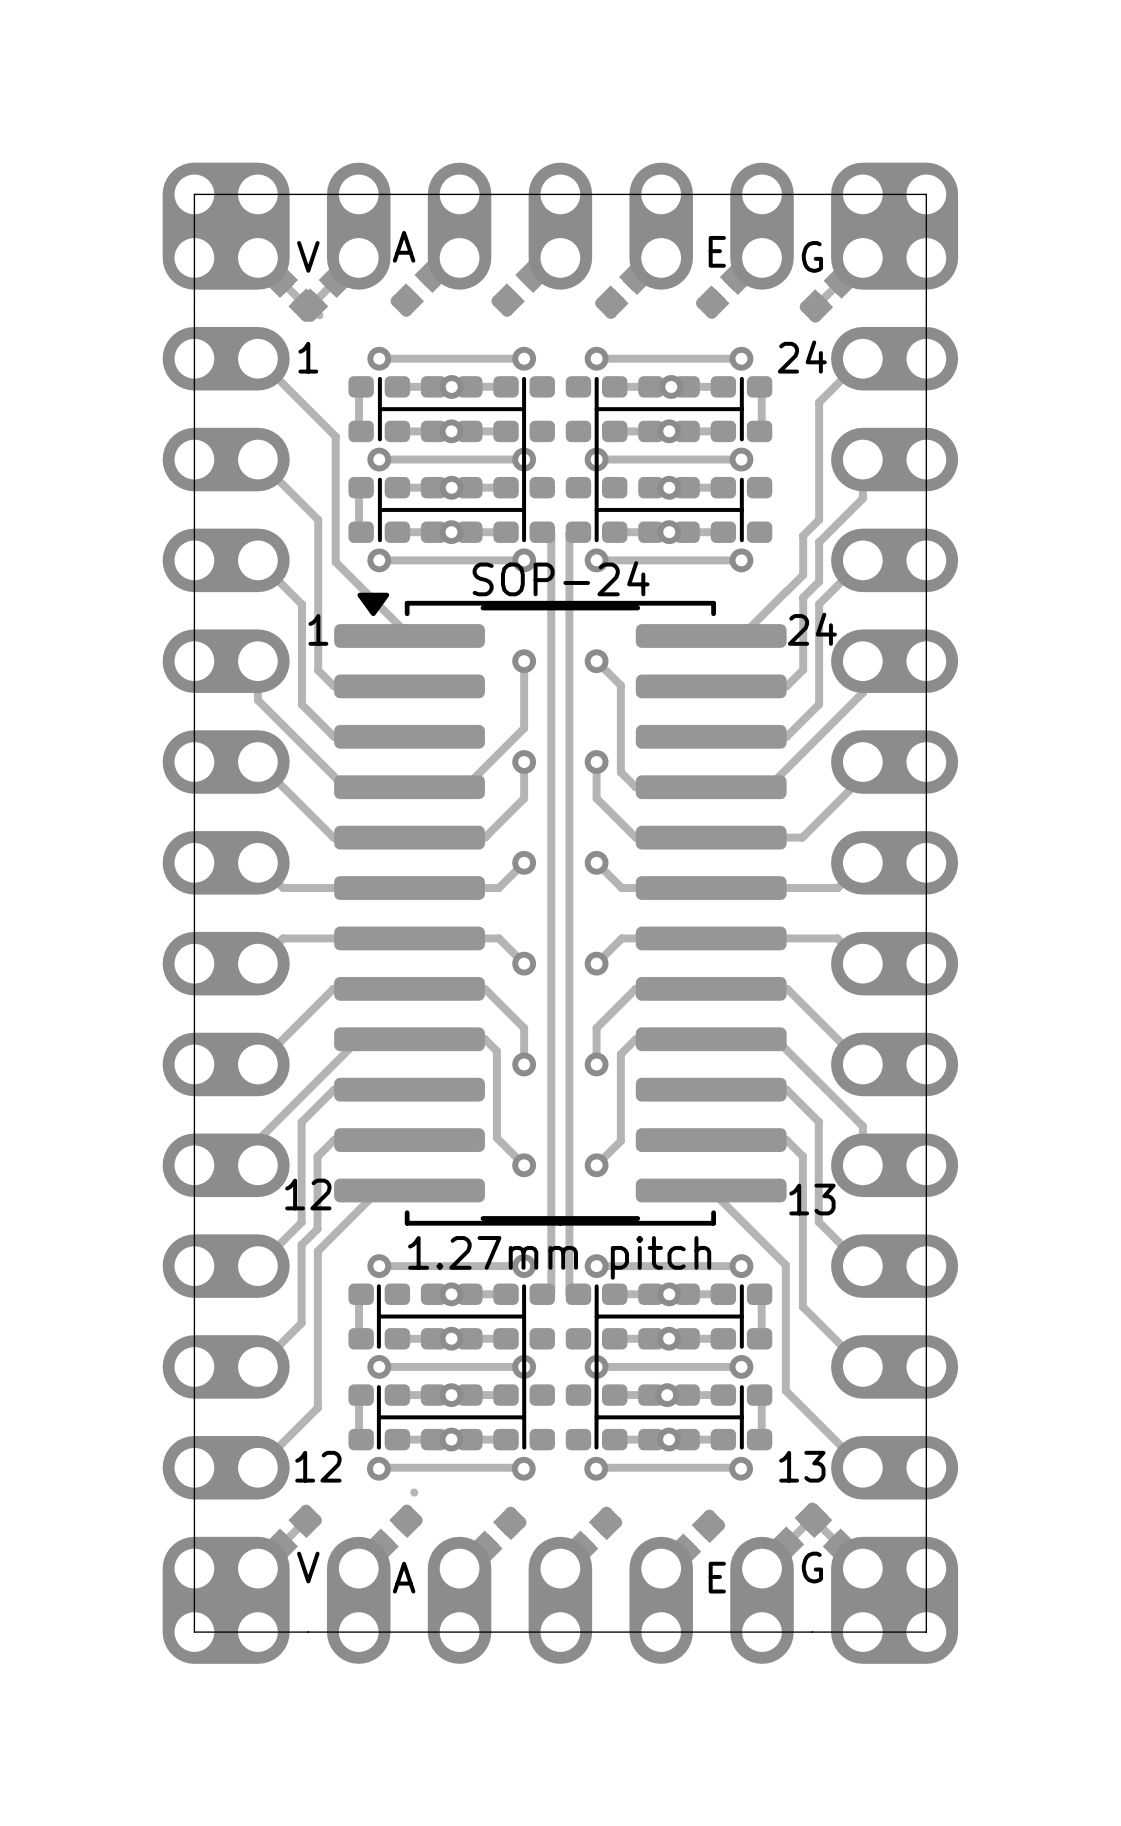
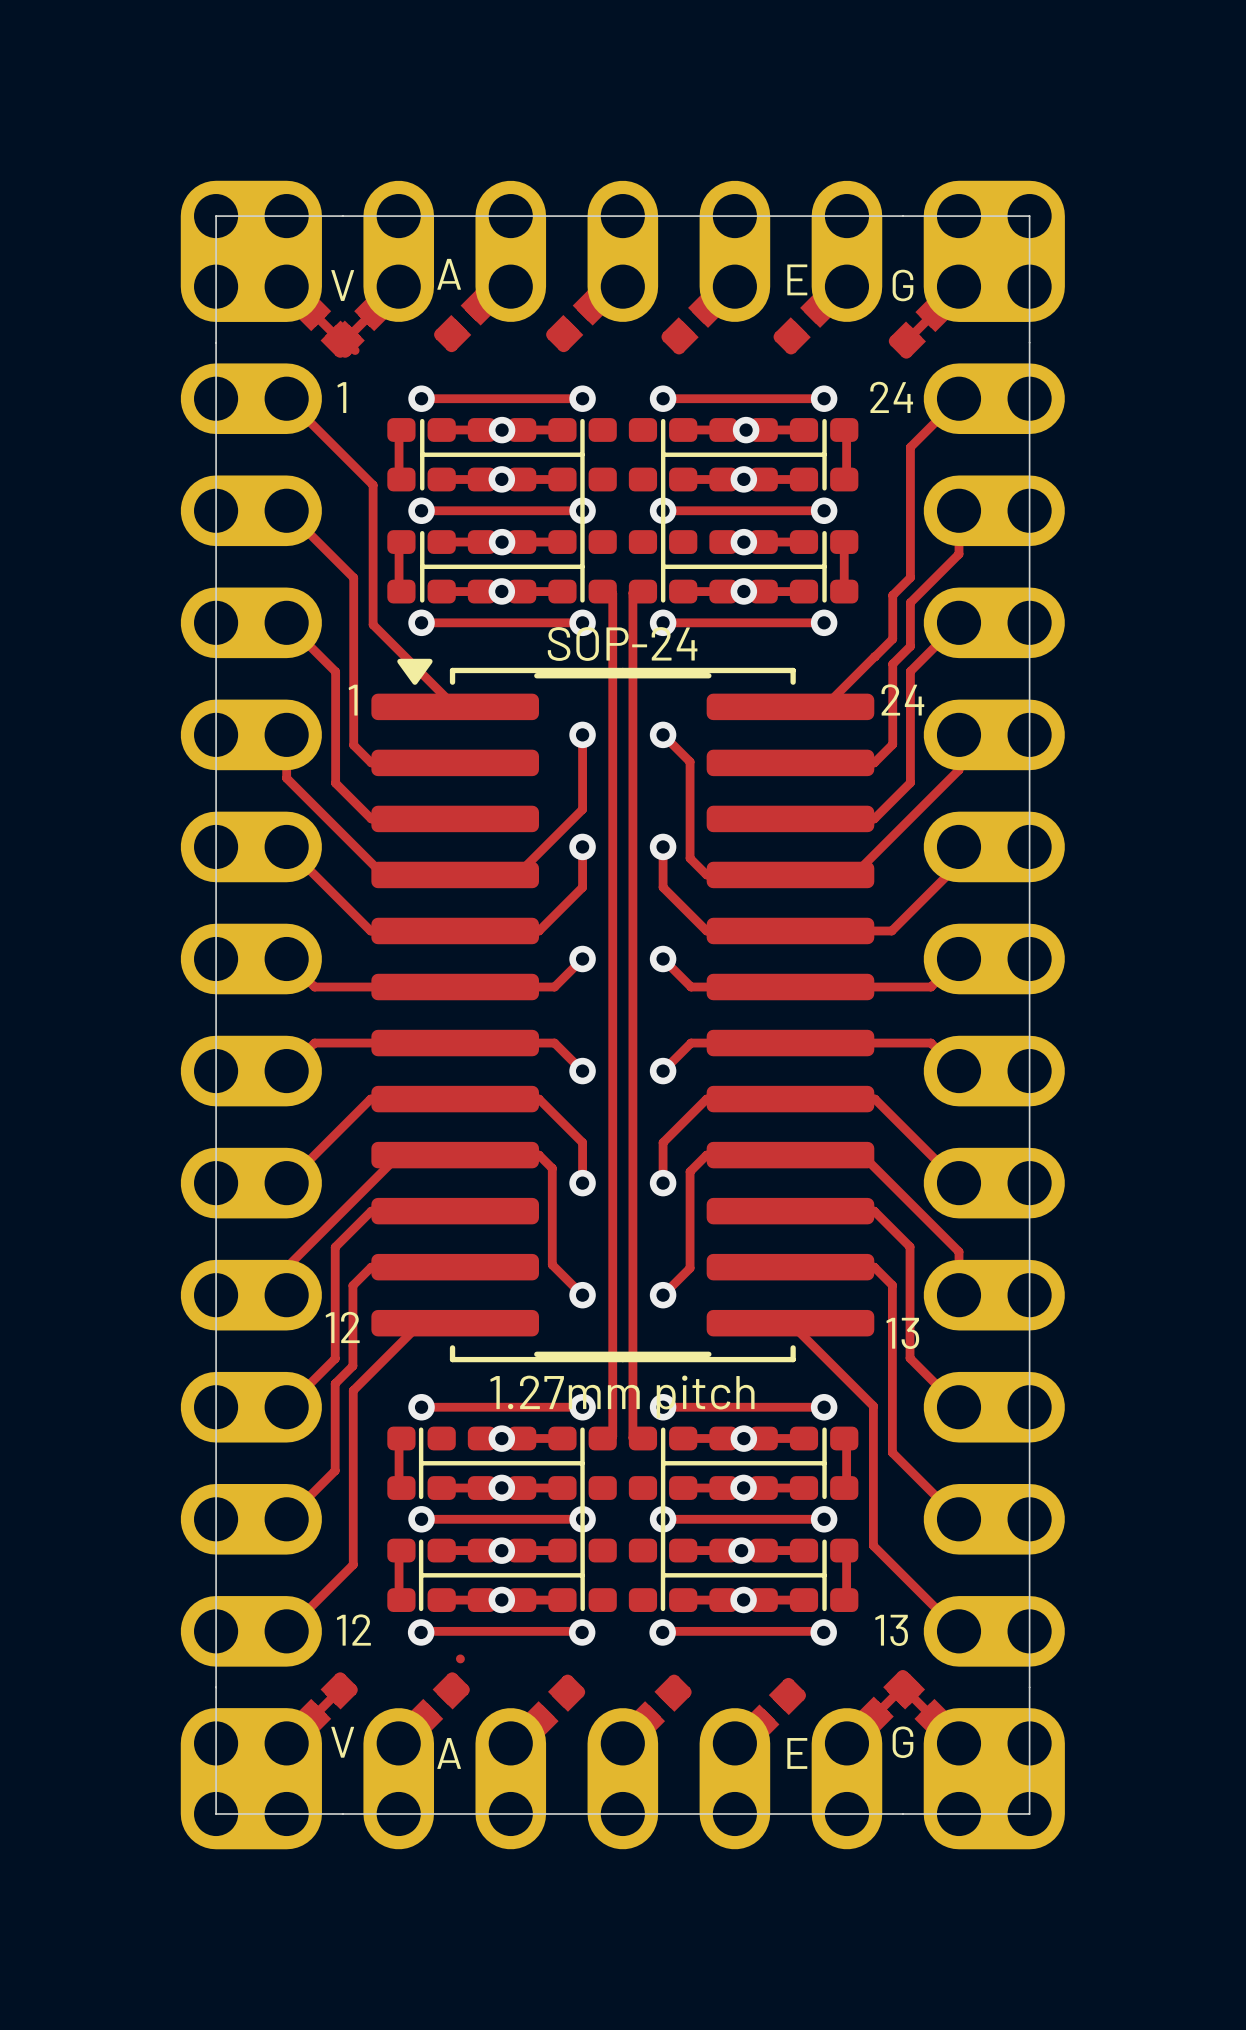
track: none -> (844, 542) (844, 591)

